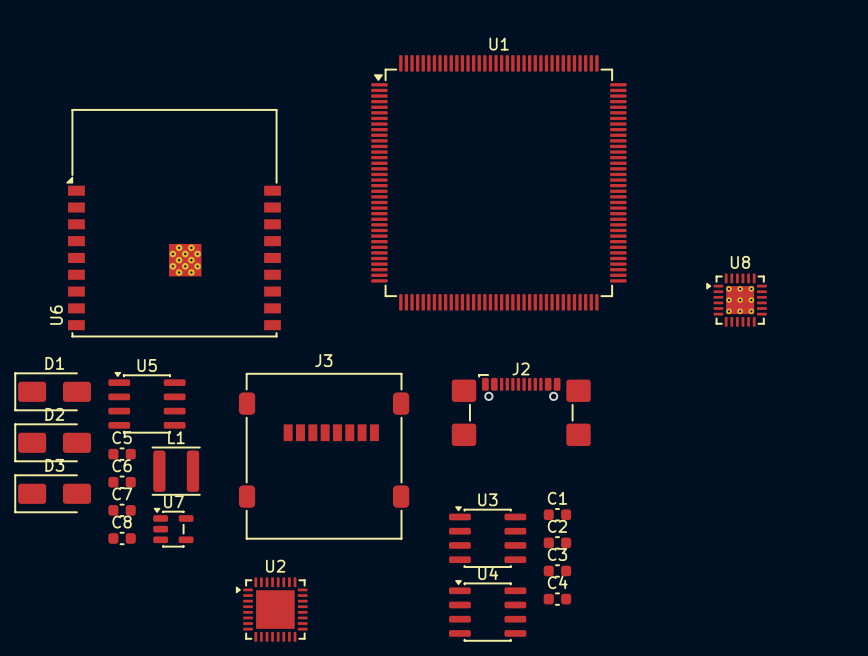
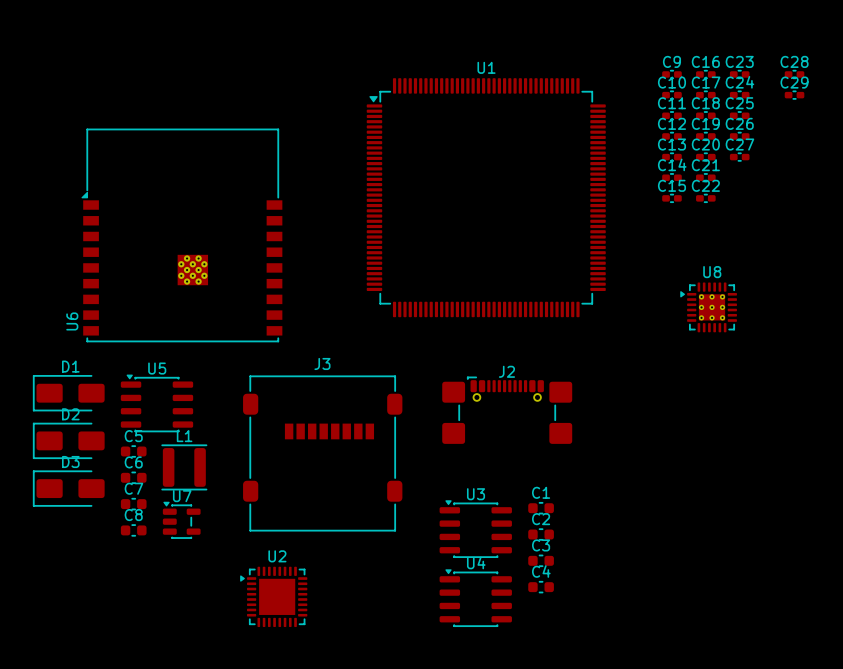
C9: none -> (671, 74)
C16: none -> (705, 74)
C23: none -> (739, 74)
C28: none -> (794, 74)
C10: none -> (671, 95)
C17: none -> (705, 95)
C24: none -> (739, 95)
C29: none -> (794, 95)
C11: none -> (671, 115)
C18: none -> (705, 115)
C25: none -> (739, 115)
C12: none -> (671, 136)
C19: none -> (705, 136)
C26: none -> (739, 136)
C13: none -> (671, 157)
C20: none -> (705, 157)
C27: none -> (739, 157)
C14: none -> (671, 177)
C21: none -> (705, 177)
C15: none -> (671, 198)
C22: none -> (705, 198)

